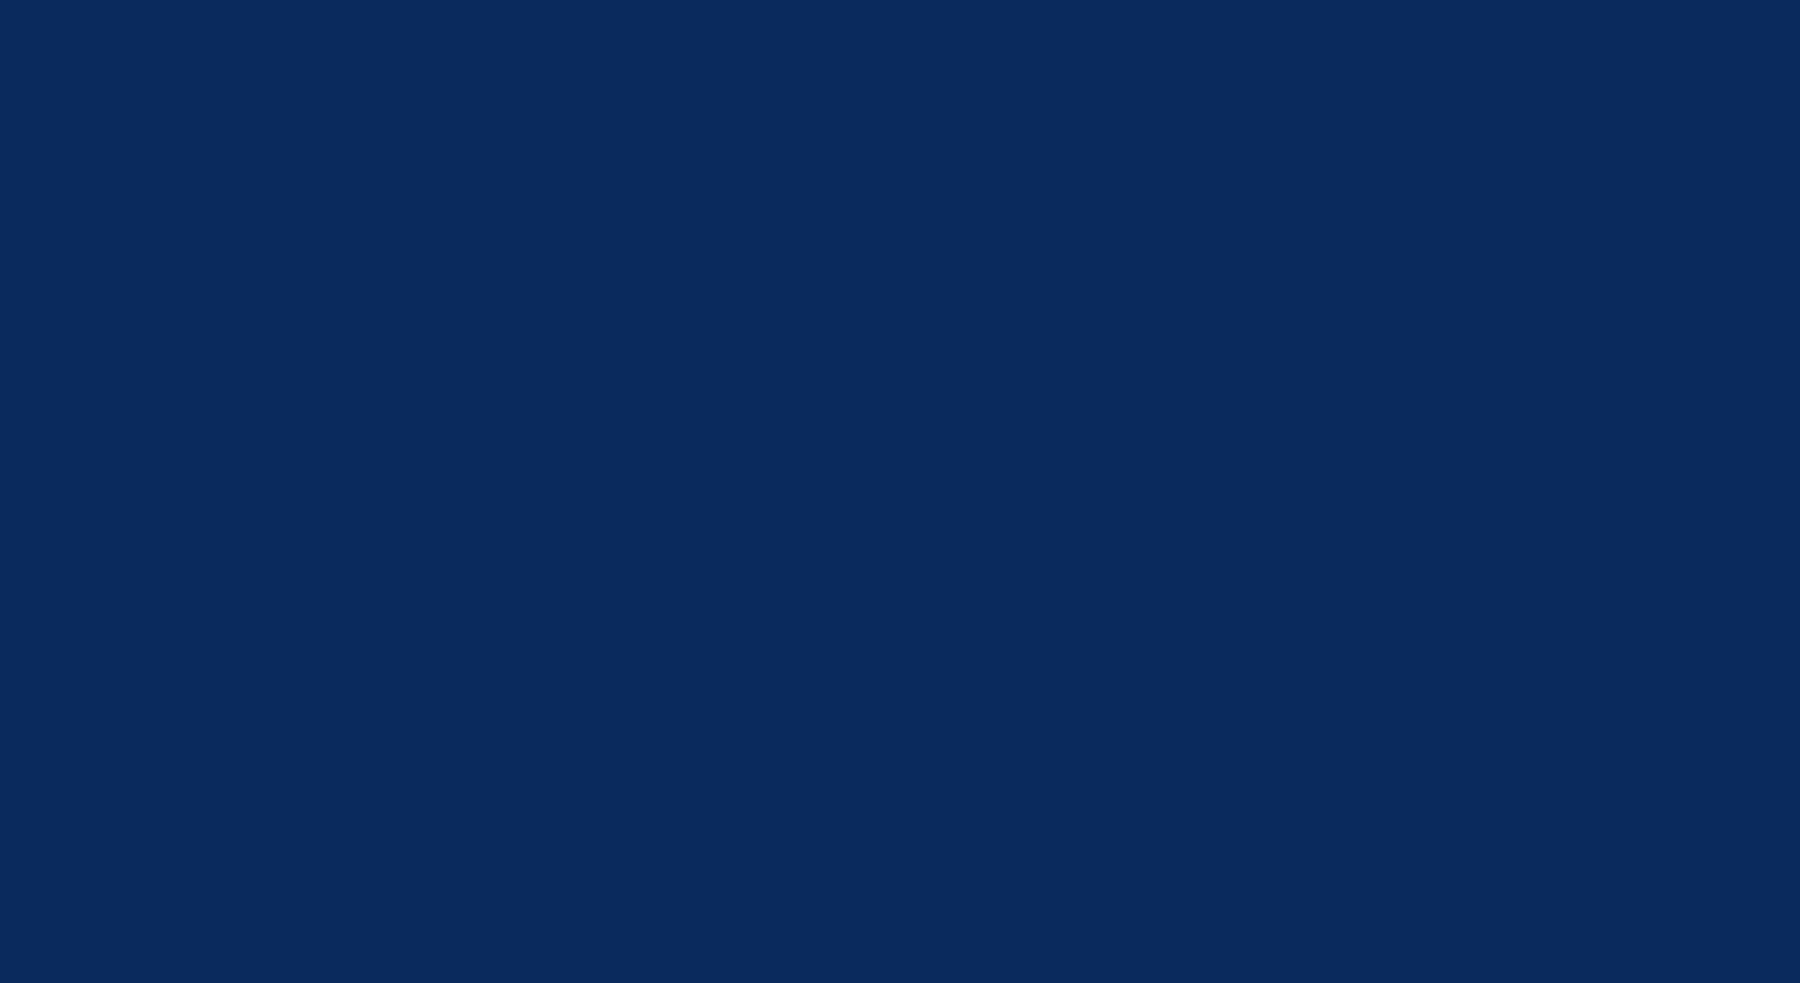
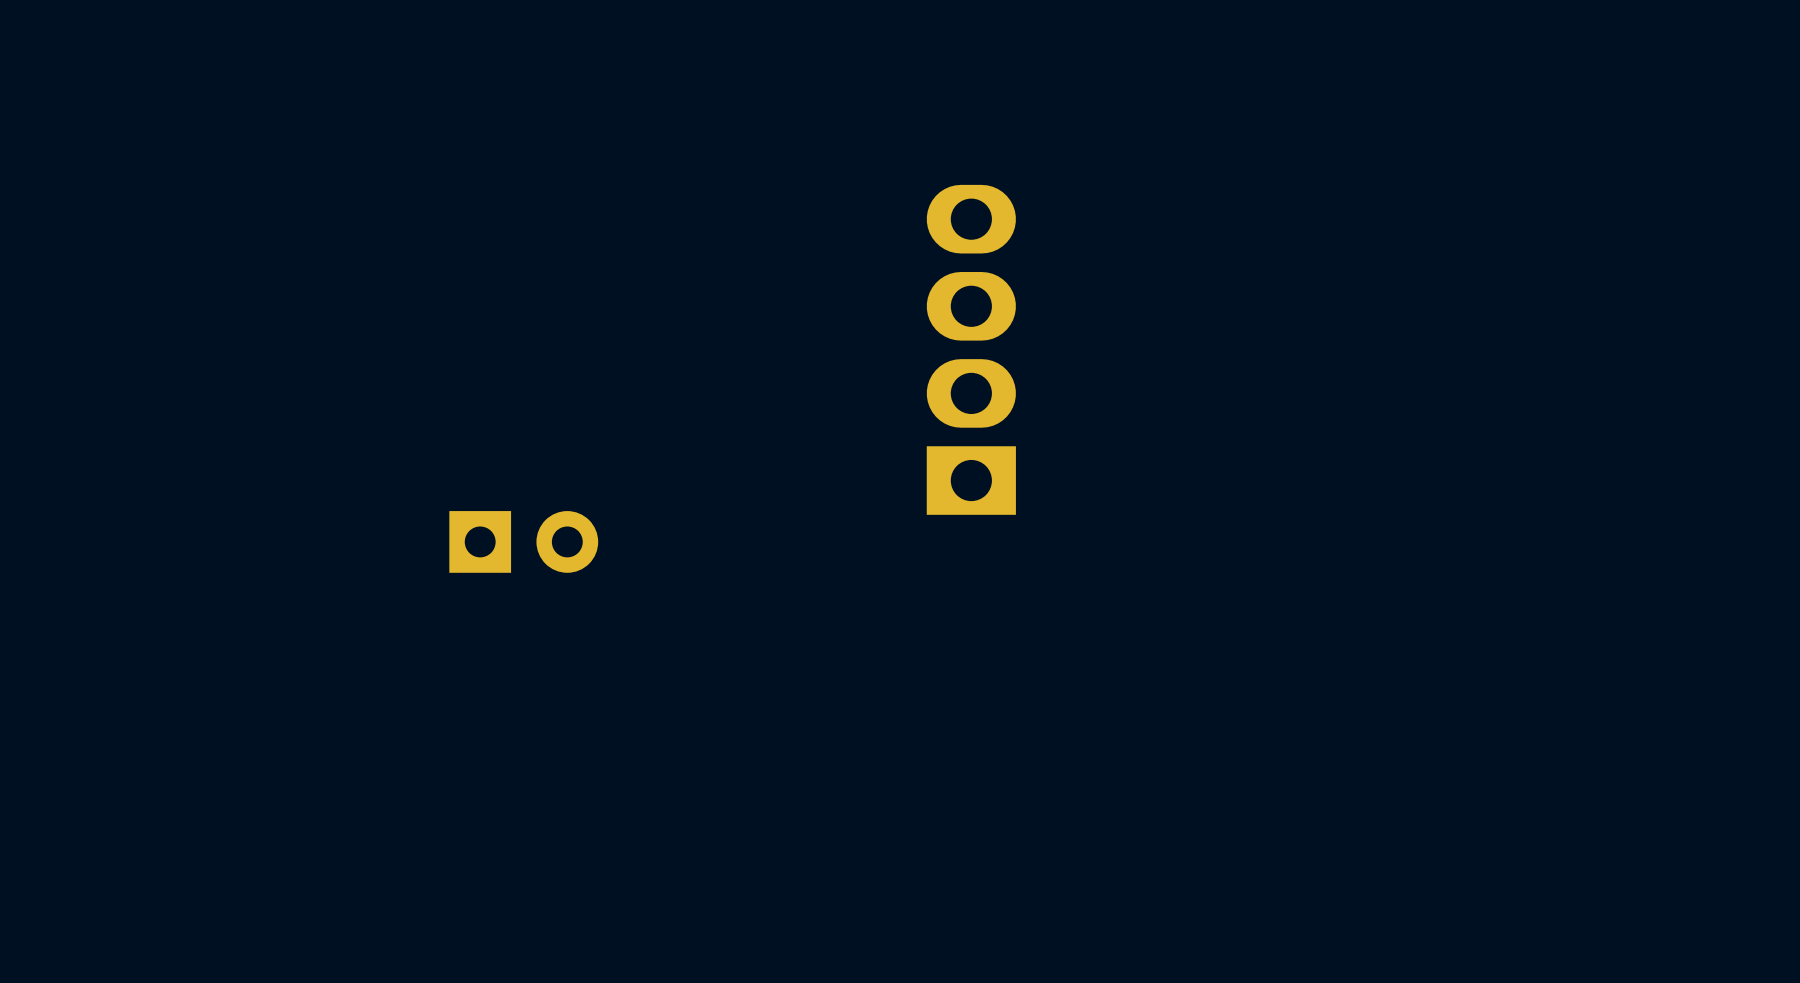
part: none -> (971, 349)
part: none -> (523, 541)

